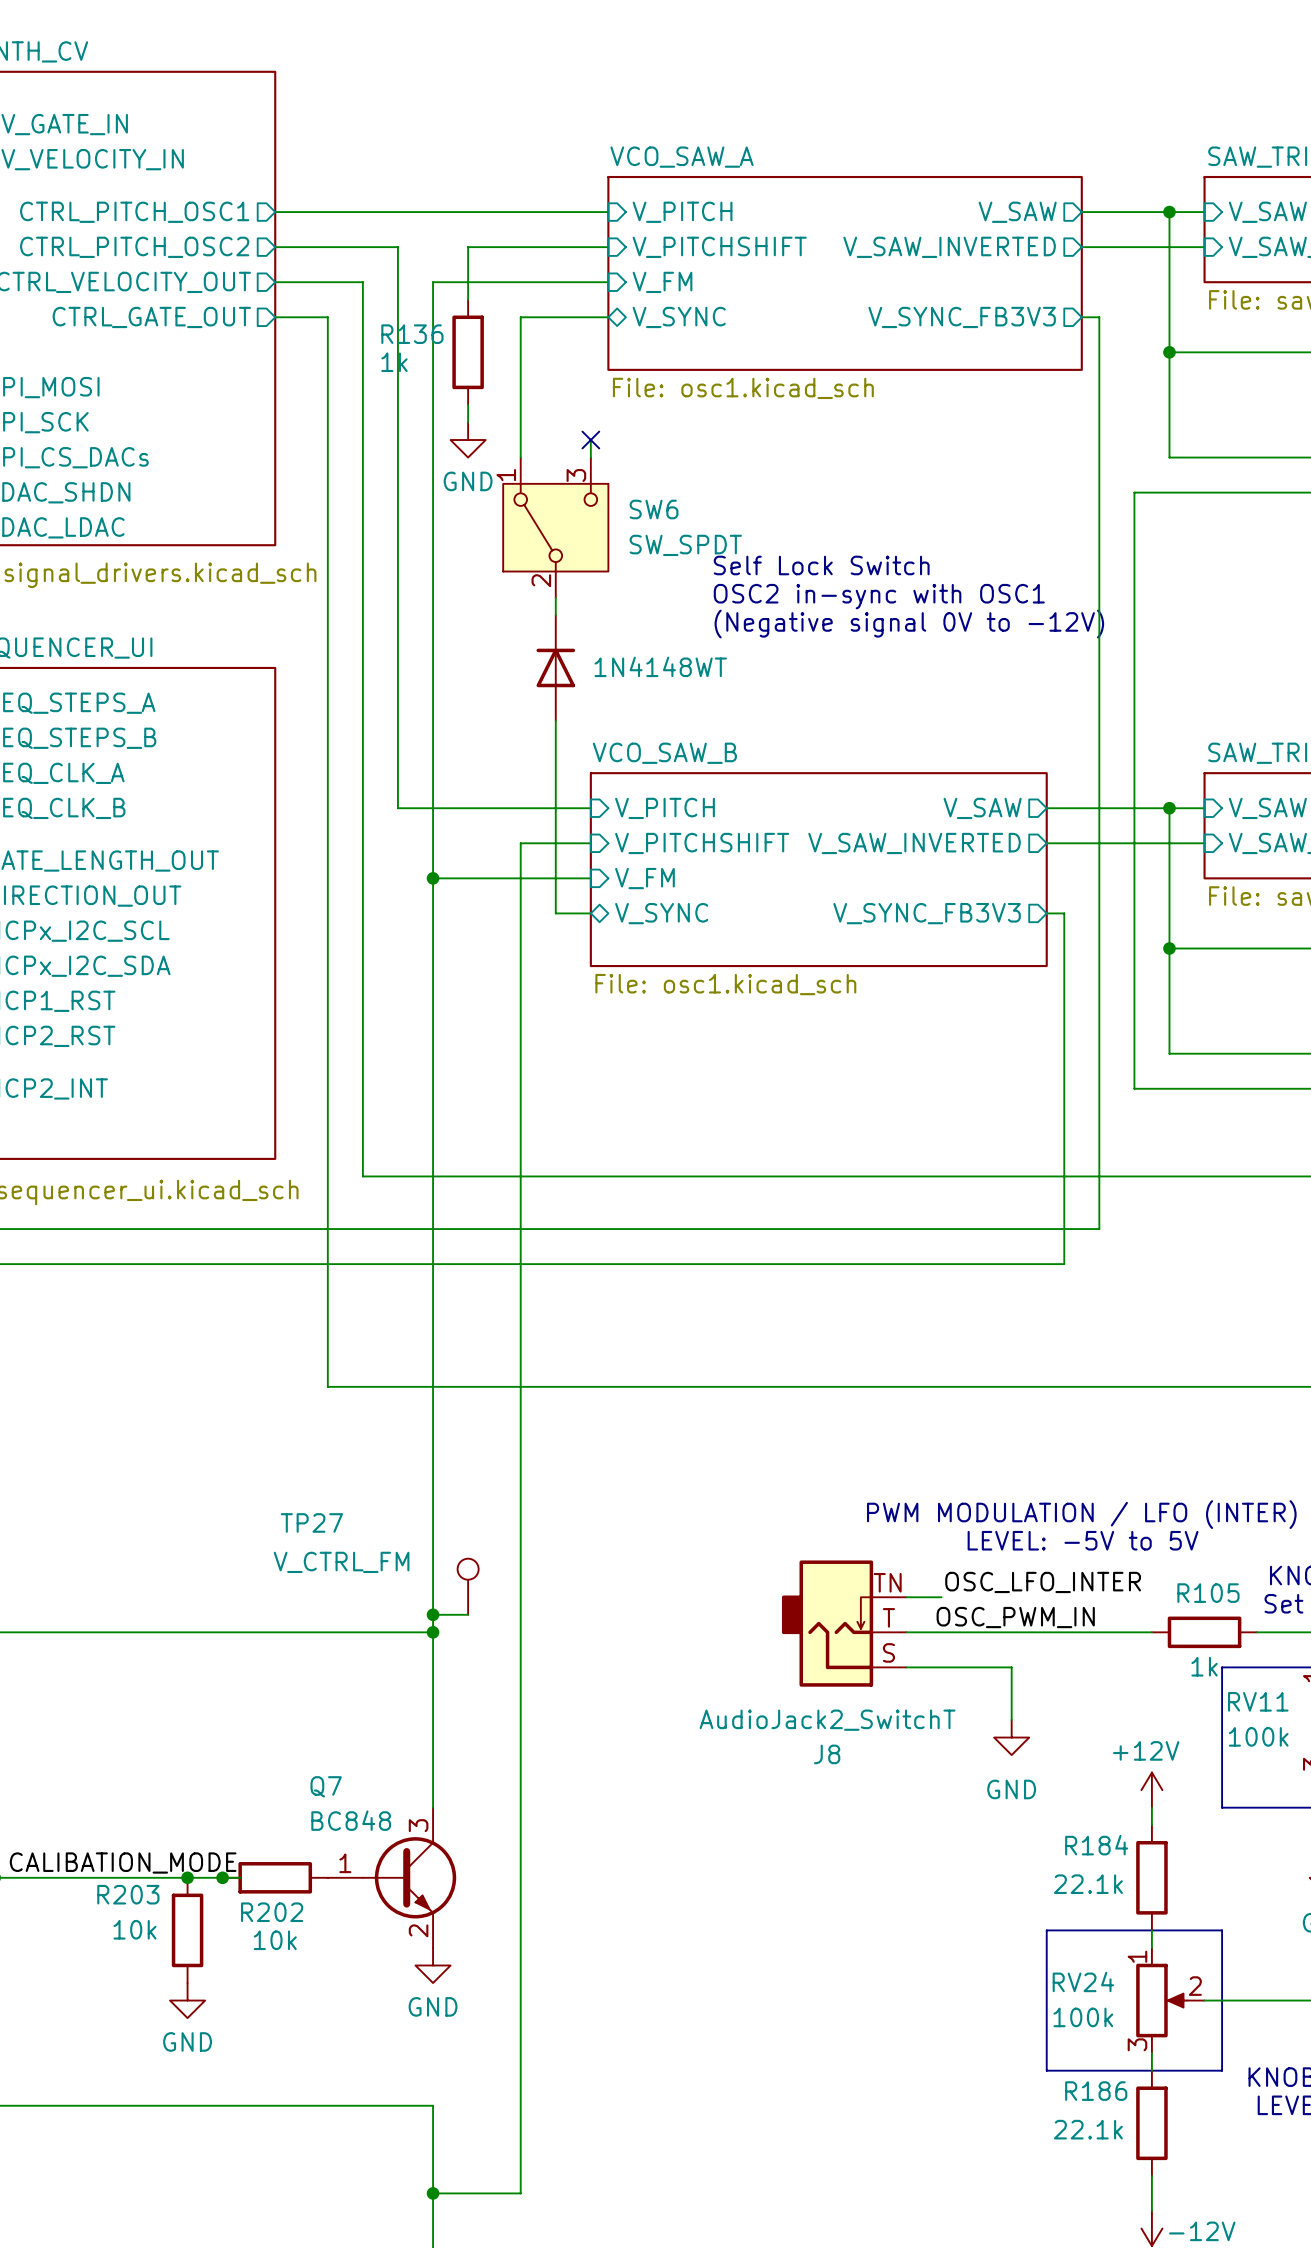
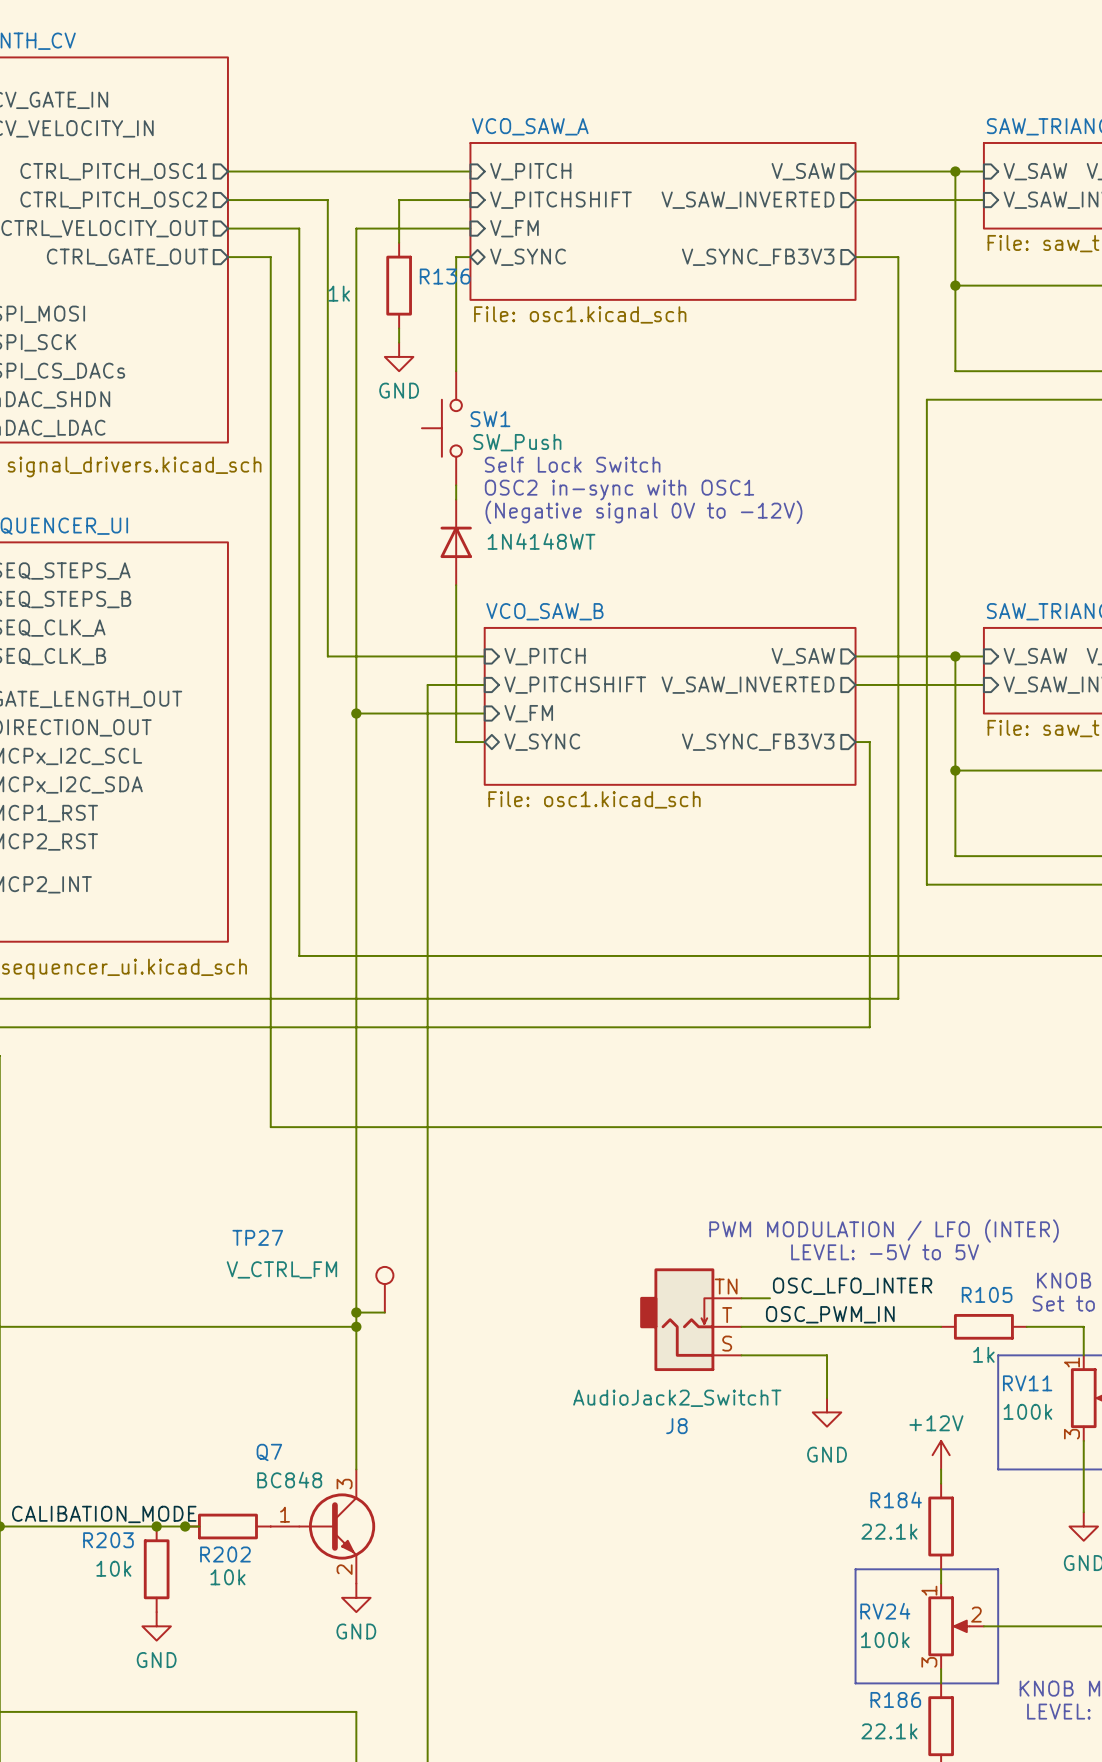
wire: (573, 212) (608, 212) -> none
sheet pin position: V_PITCH (682, 212) -> V_PITCH (530, 171)
sheet pin position: V_SAW (1017, 212) -> V_SAW (803, 171)
wire: none -> (855, 171) (884, 171)
wire: (485, 247) (468, 247) (468, 299) -> (399, 200) (399, 242)
wire: (573, 247) (608, 247) -> none
sheet pin position: V_PITCHSHIFT (719, 247) -> V_PITCHSHIFT (560, 200)
sheet pin position: V_SAW_INVERTED (949, 247) -> V_SAW_INVERTED (748, 200)
wire: none -> (855, 200) (884, 200)
sheet VCO_SAW_A position: (845, 273) -> (662, 221)
wire: (573, 282) (608, 282) -> none
sheet pin position: V_FM (662, 282) -> V_FM (514, 228)
wire: (555, 317) (520, 317) (520, 457) -> (456, 257) (456, 371)
wire: (573, 317) (608, 317) -> none
sheet pin position: V_SYNC (679, 317) -> V_SYNC (528, 257)
sheet pin position: V_SYNC_FB3V3 (962, 317) -> V_SYNC_FB3V3 (758, 257)
wire: none -> (855, 257) (884, 257)
R136 name position: R136 (412, 334) -> R136 (445, 276)
R136 position: (468, 352) -> (399, 285)
wire: (468, 404) (468, 422) -> (399, 328) (399, 342)
power symbol position: GND (468, 440) -> GND (399, 356)
wire: (590, 440) (590, 457) -> none
no-connect mark: (590, 440) -> none
SW1: none -> SW_Push (441, 428)
SW6: SW_SPDT (555, 527) -> none
text position: Self Lock Switch (821, 565) -> Self Lock Switch (572, 464)
text position: OSC2 in-sync with OSC1 (879, 596) -> OSC2 in-sync with OSC1 (619, 490)
text position: (Negative signal 0V to -12V) (909, 624) -> (Negative signal 0V to -12V) (643, 512)

